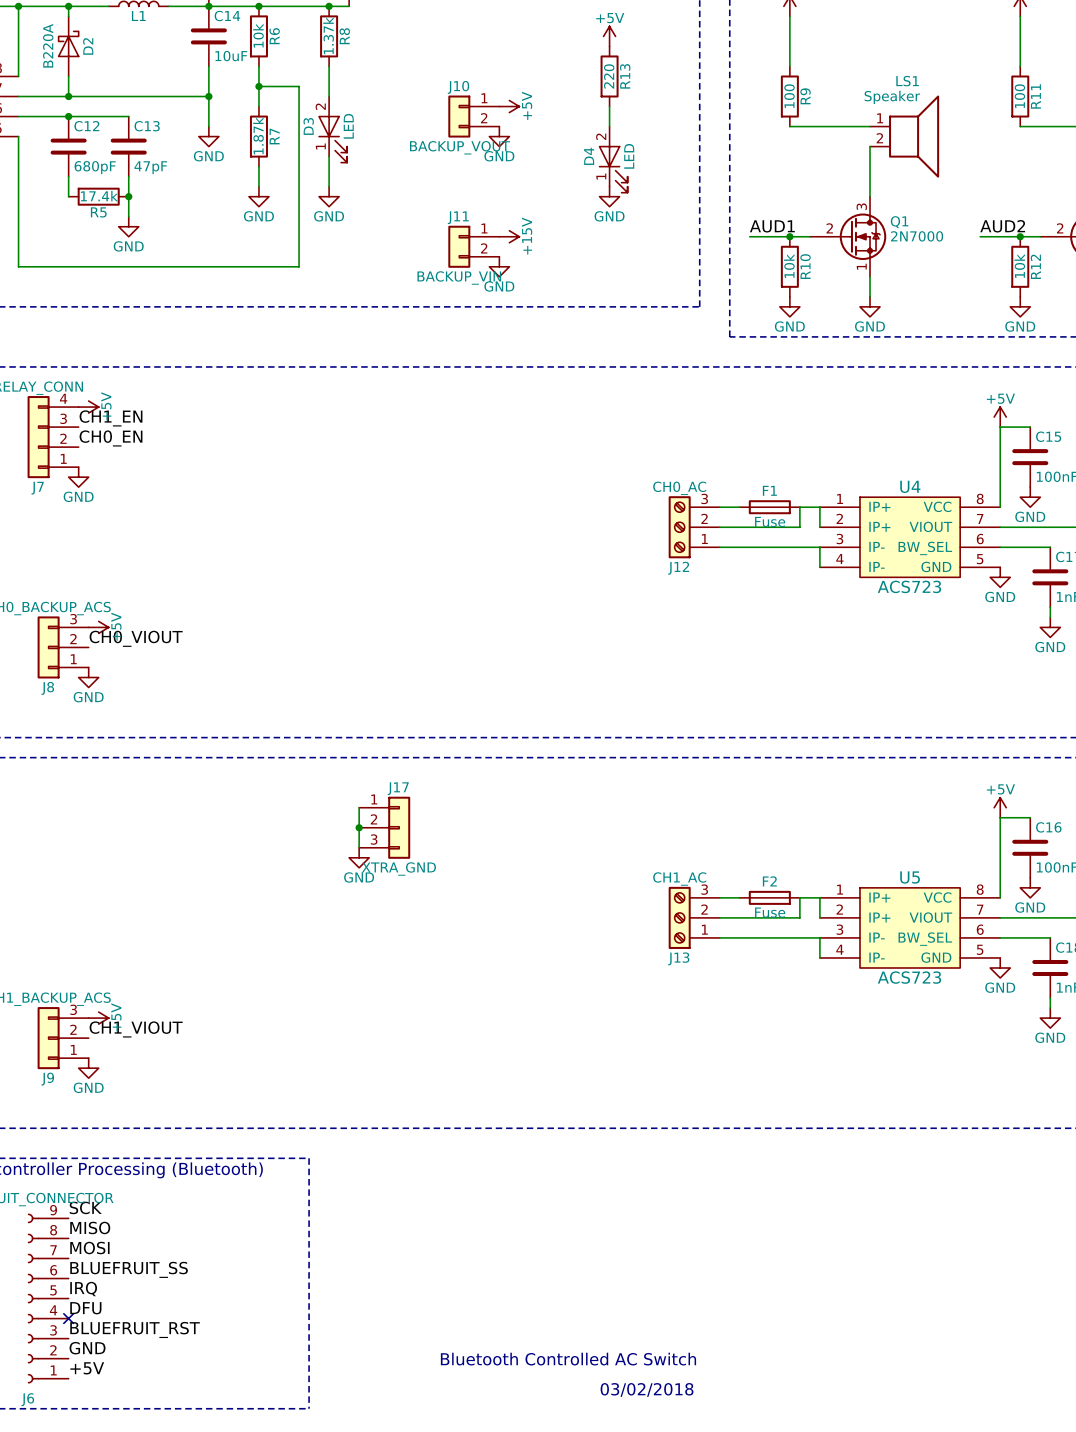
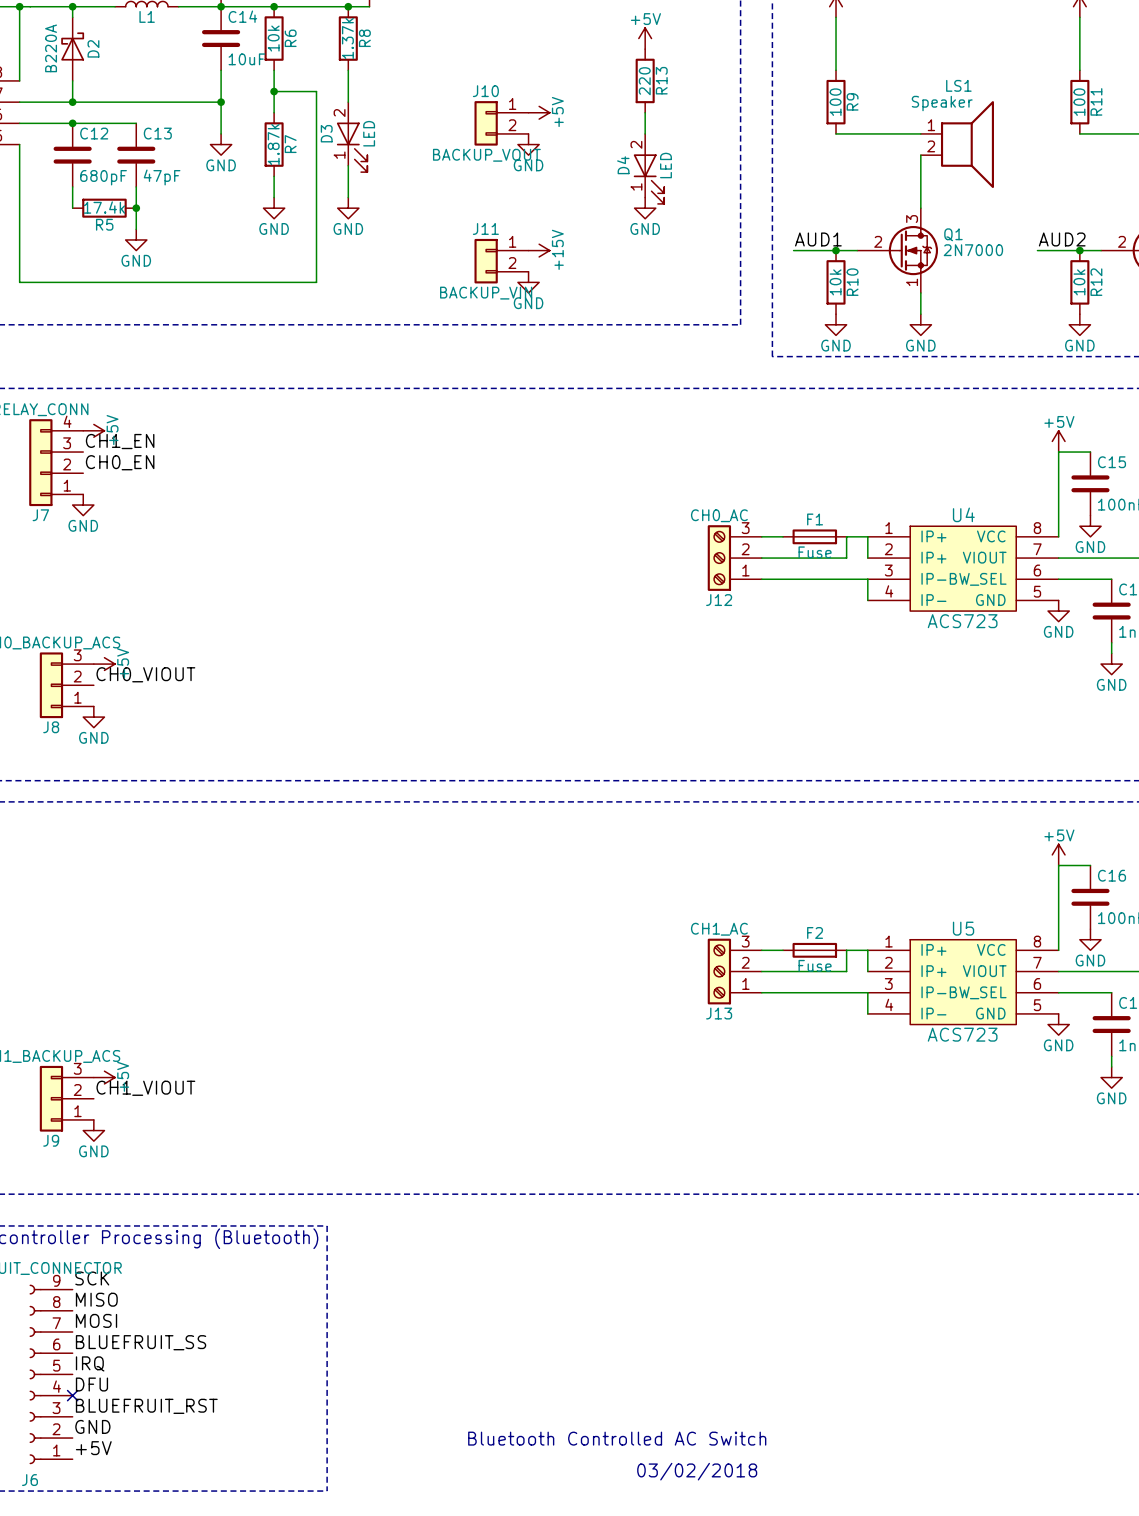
wire: (359, 807) (359, 847) -> none
junction: (359, 827) -> none
J17: XTRA_GND (384, 827) -> none
power symbol: GND (359, 857) -> none

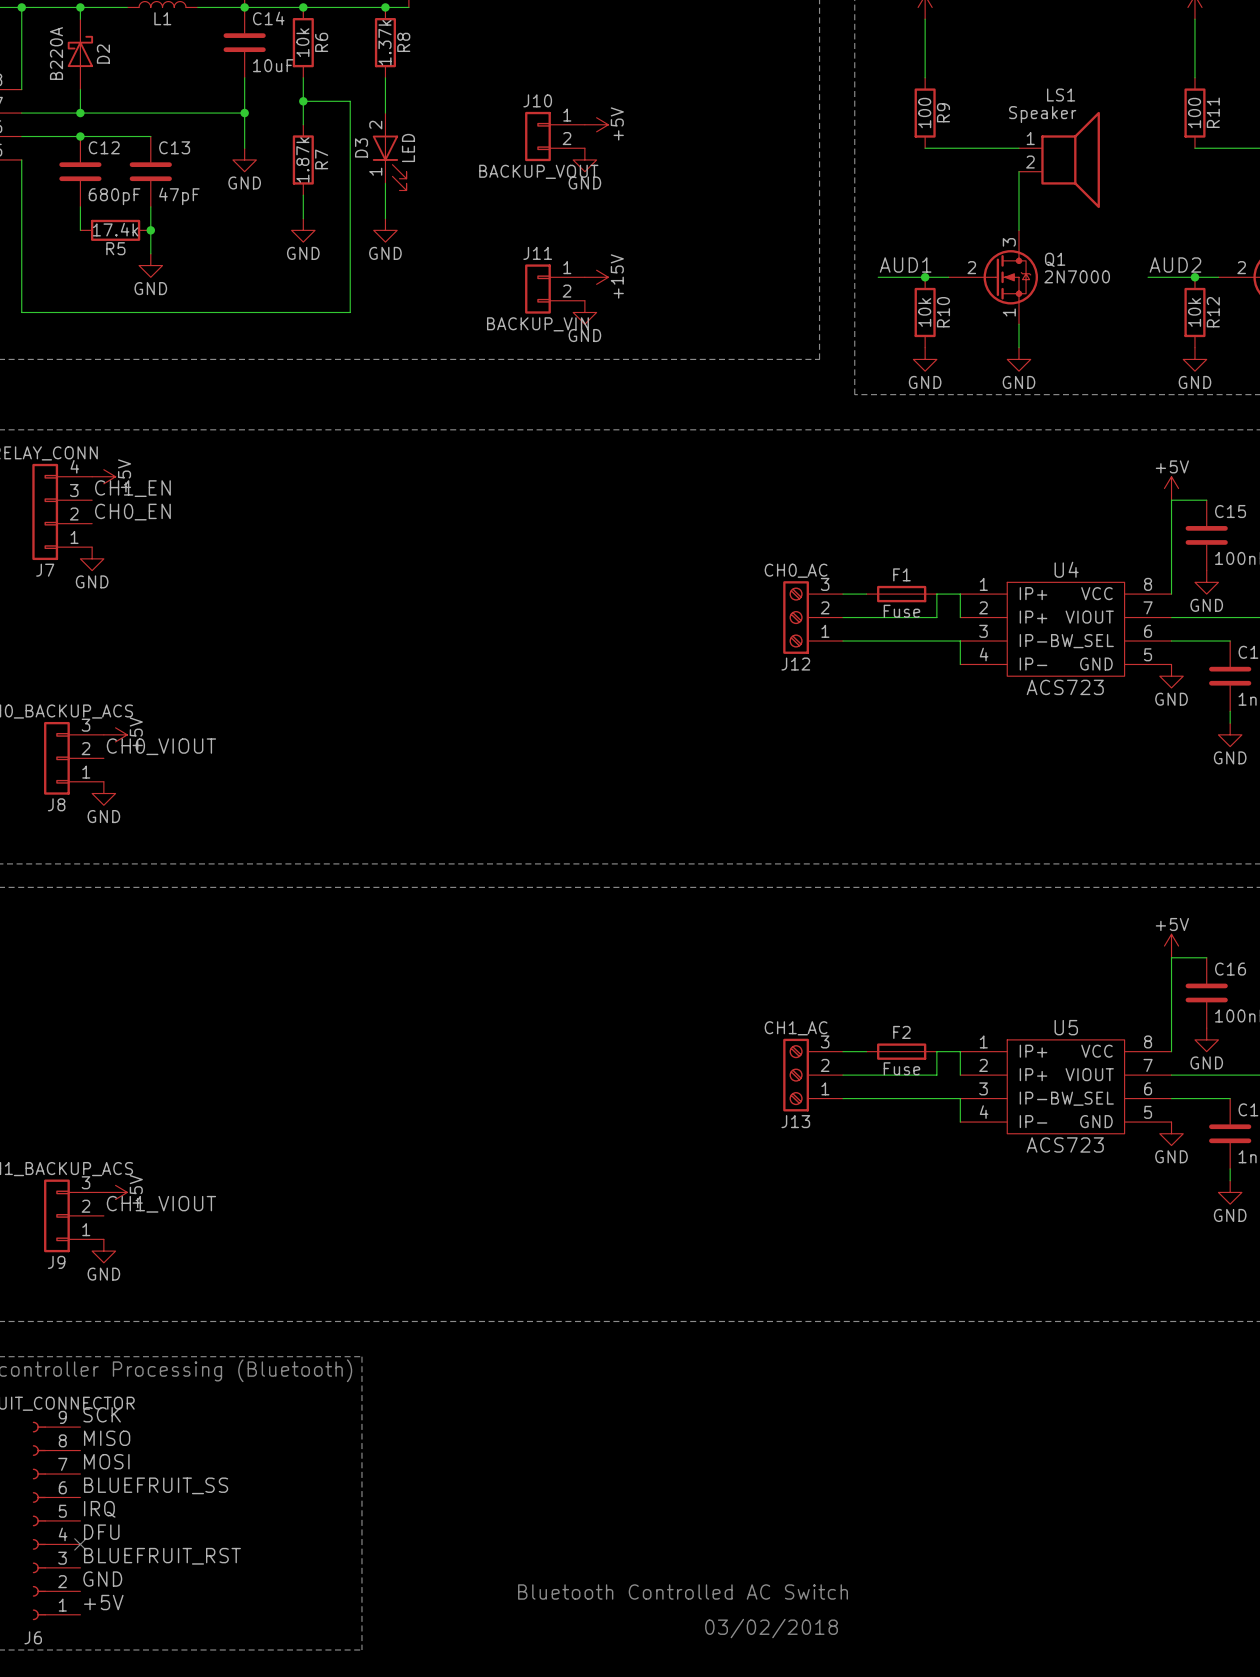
power symbol: +5V (645, 38) -> none
R13: 220 (645, 80) -> none
wire: (645, 112) (645, 133) -> none
D4: LED (648, 168) -> none
power symbol: GND (645, 208) -> none

